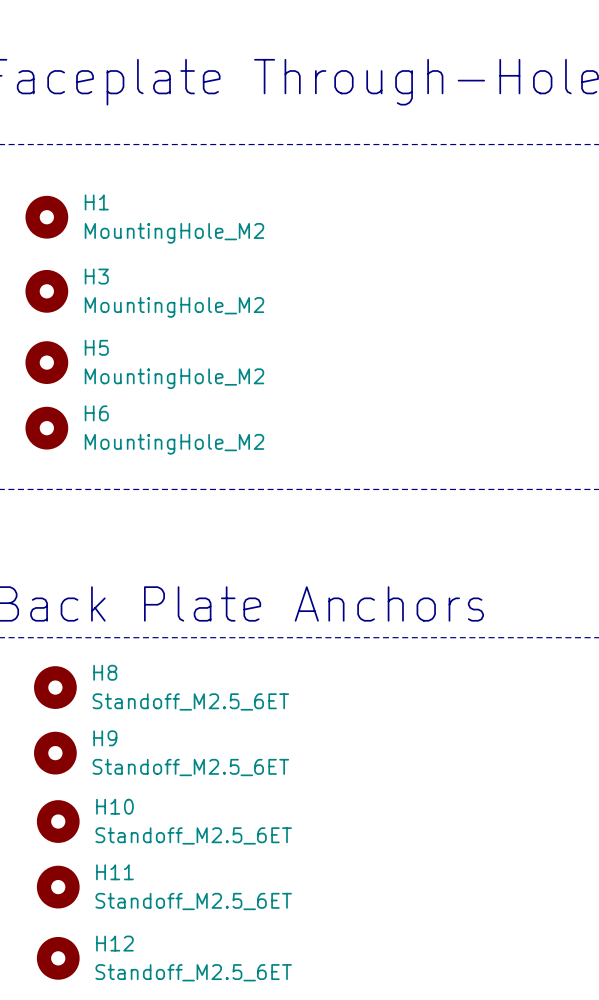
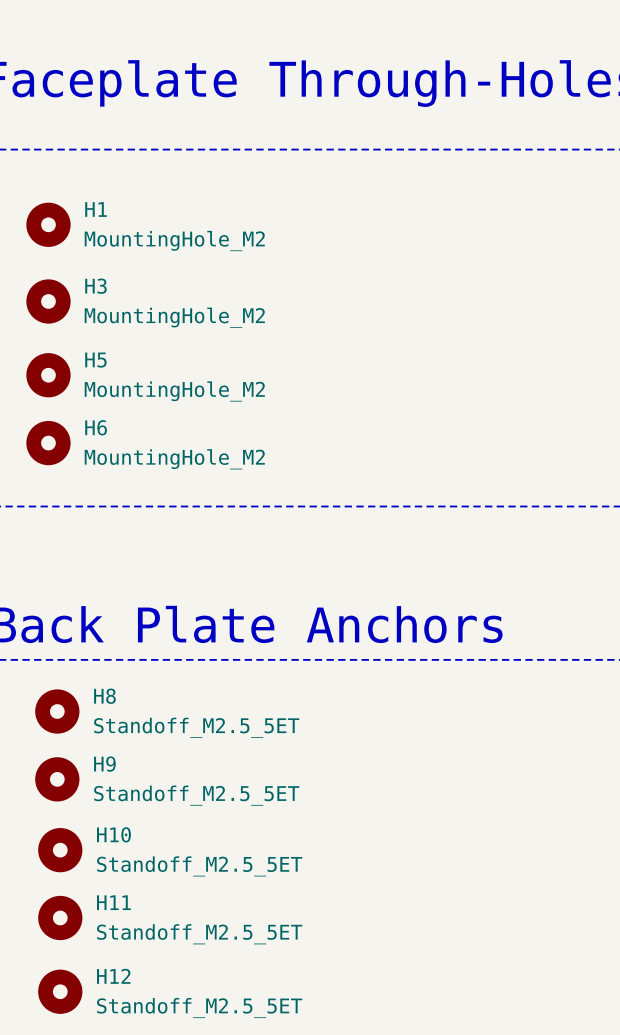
H8 value: Standoff_M2.5_6ET (190, 701) -> Standoff_M2.5_5ET (196, 727)
H9 value: Standoff_M2.5_6ET (190, 767) -> Standoff_M2.5_5ET (196, 795)
H10 value: Standoff_M2.5_6ET (193, 835) -> Standoff_M2.5_5ET (199, 866)
H11 value: Standoff_M2.5_6ET (193, 901) -> Standoff_M2.5_5ET (199, 934)
H12 value: Standoff_M2.5_6ET (193, 972) -> Standoff_M2.5_5ET (199, 1008)

